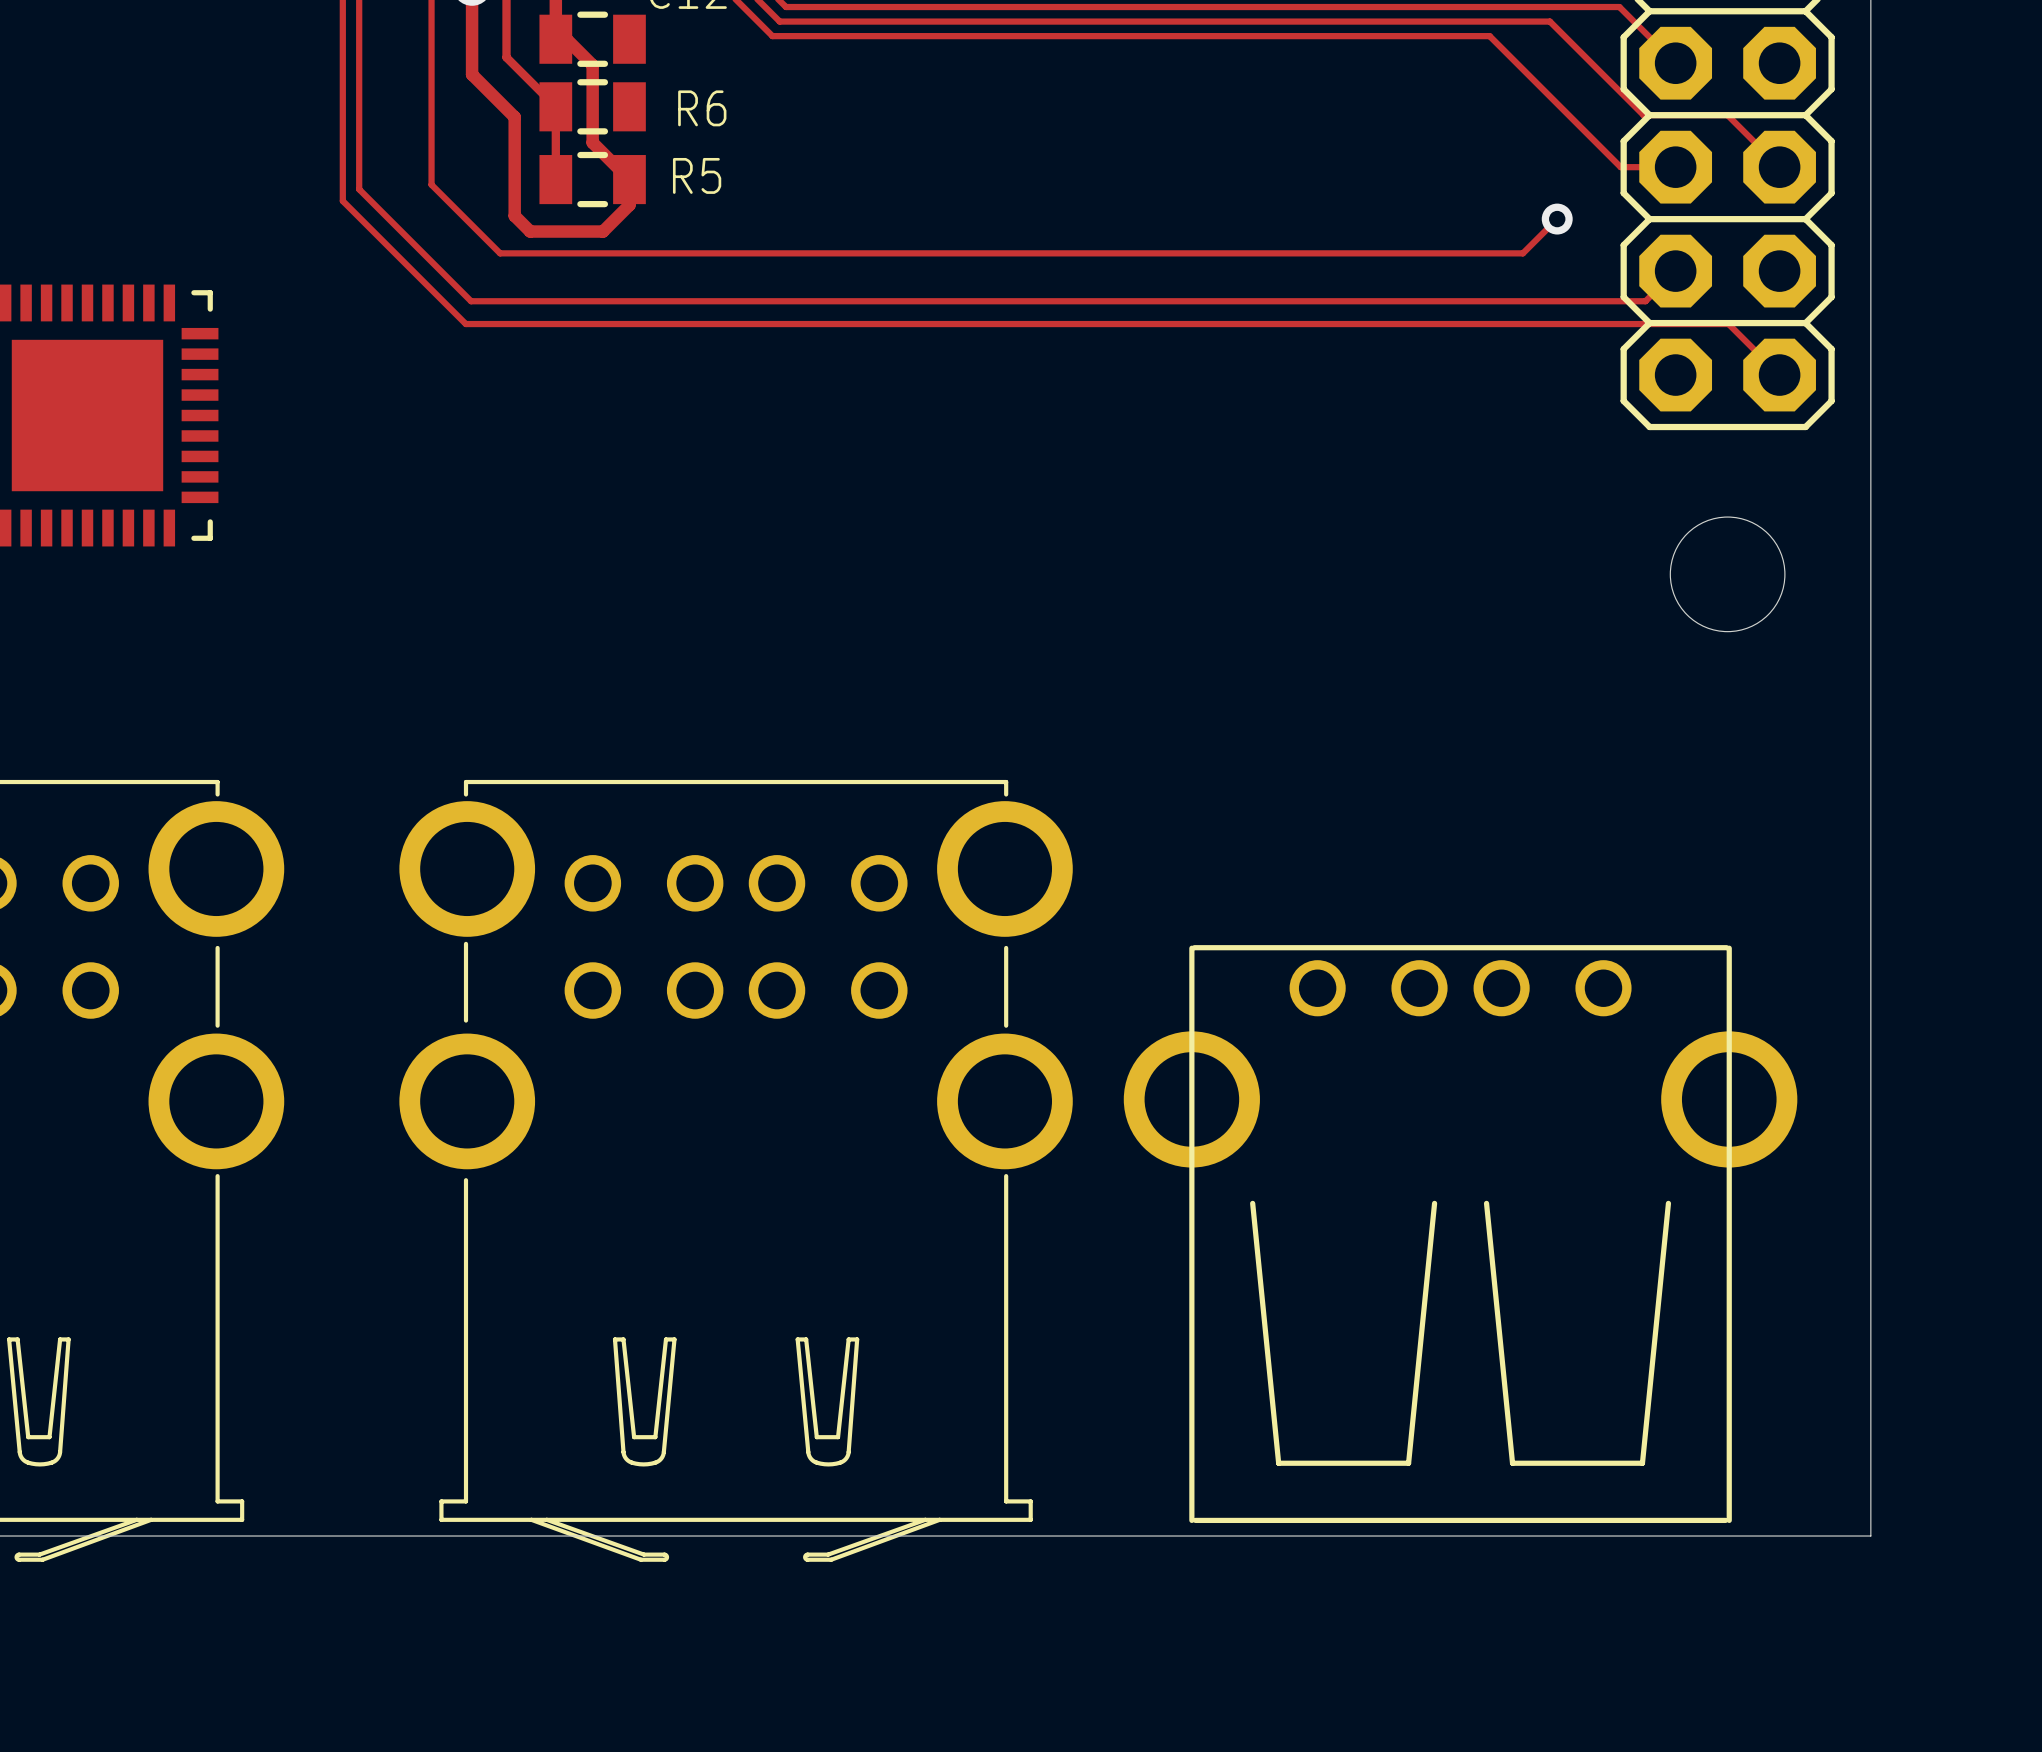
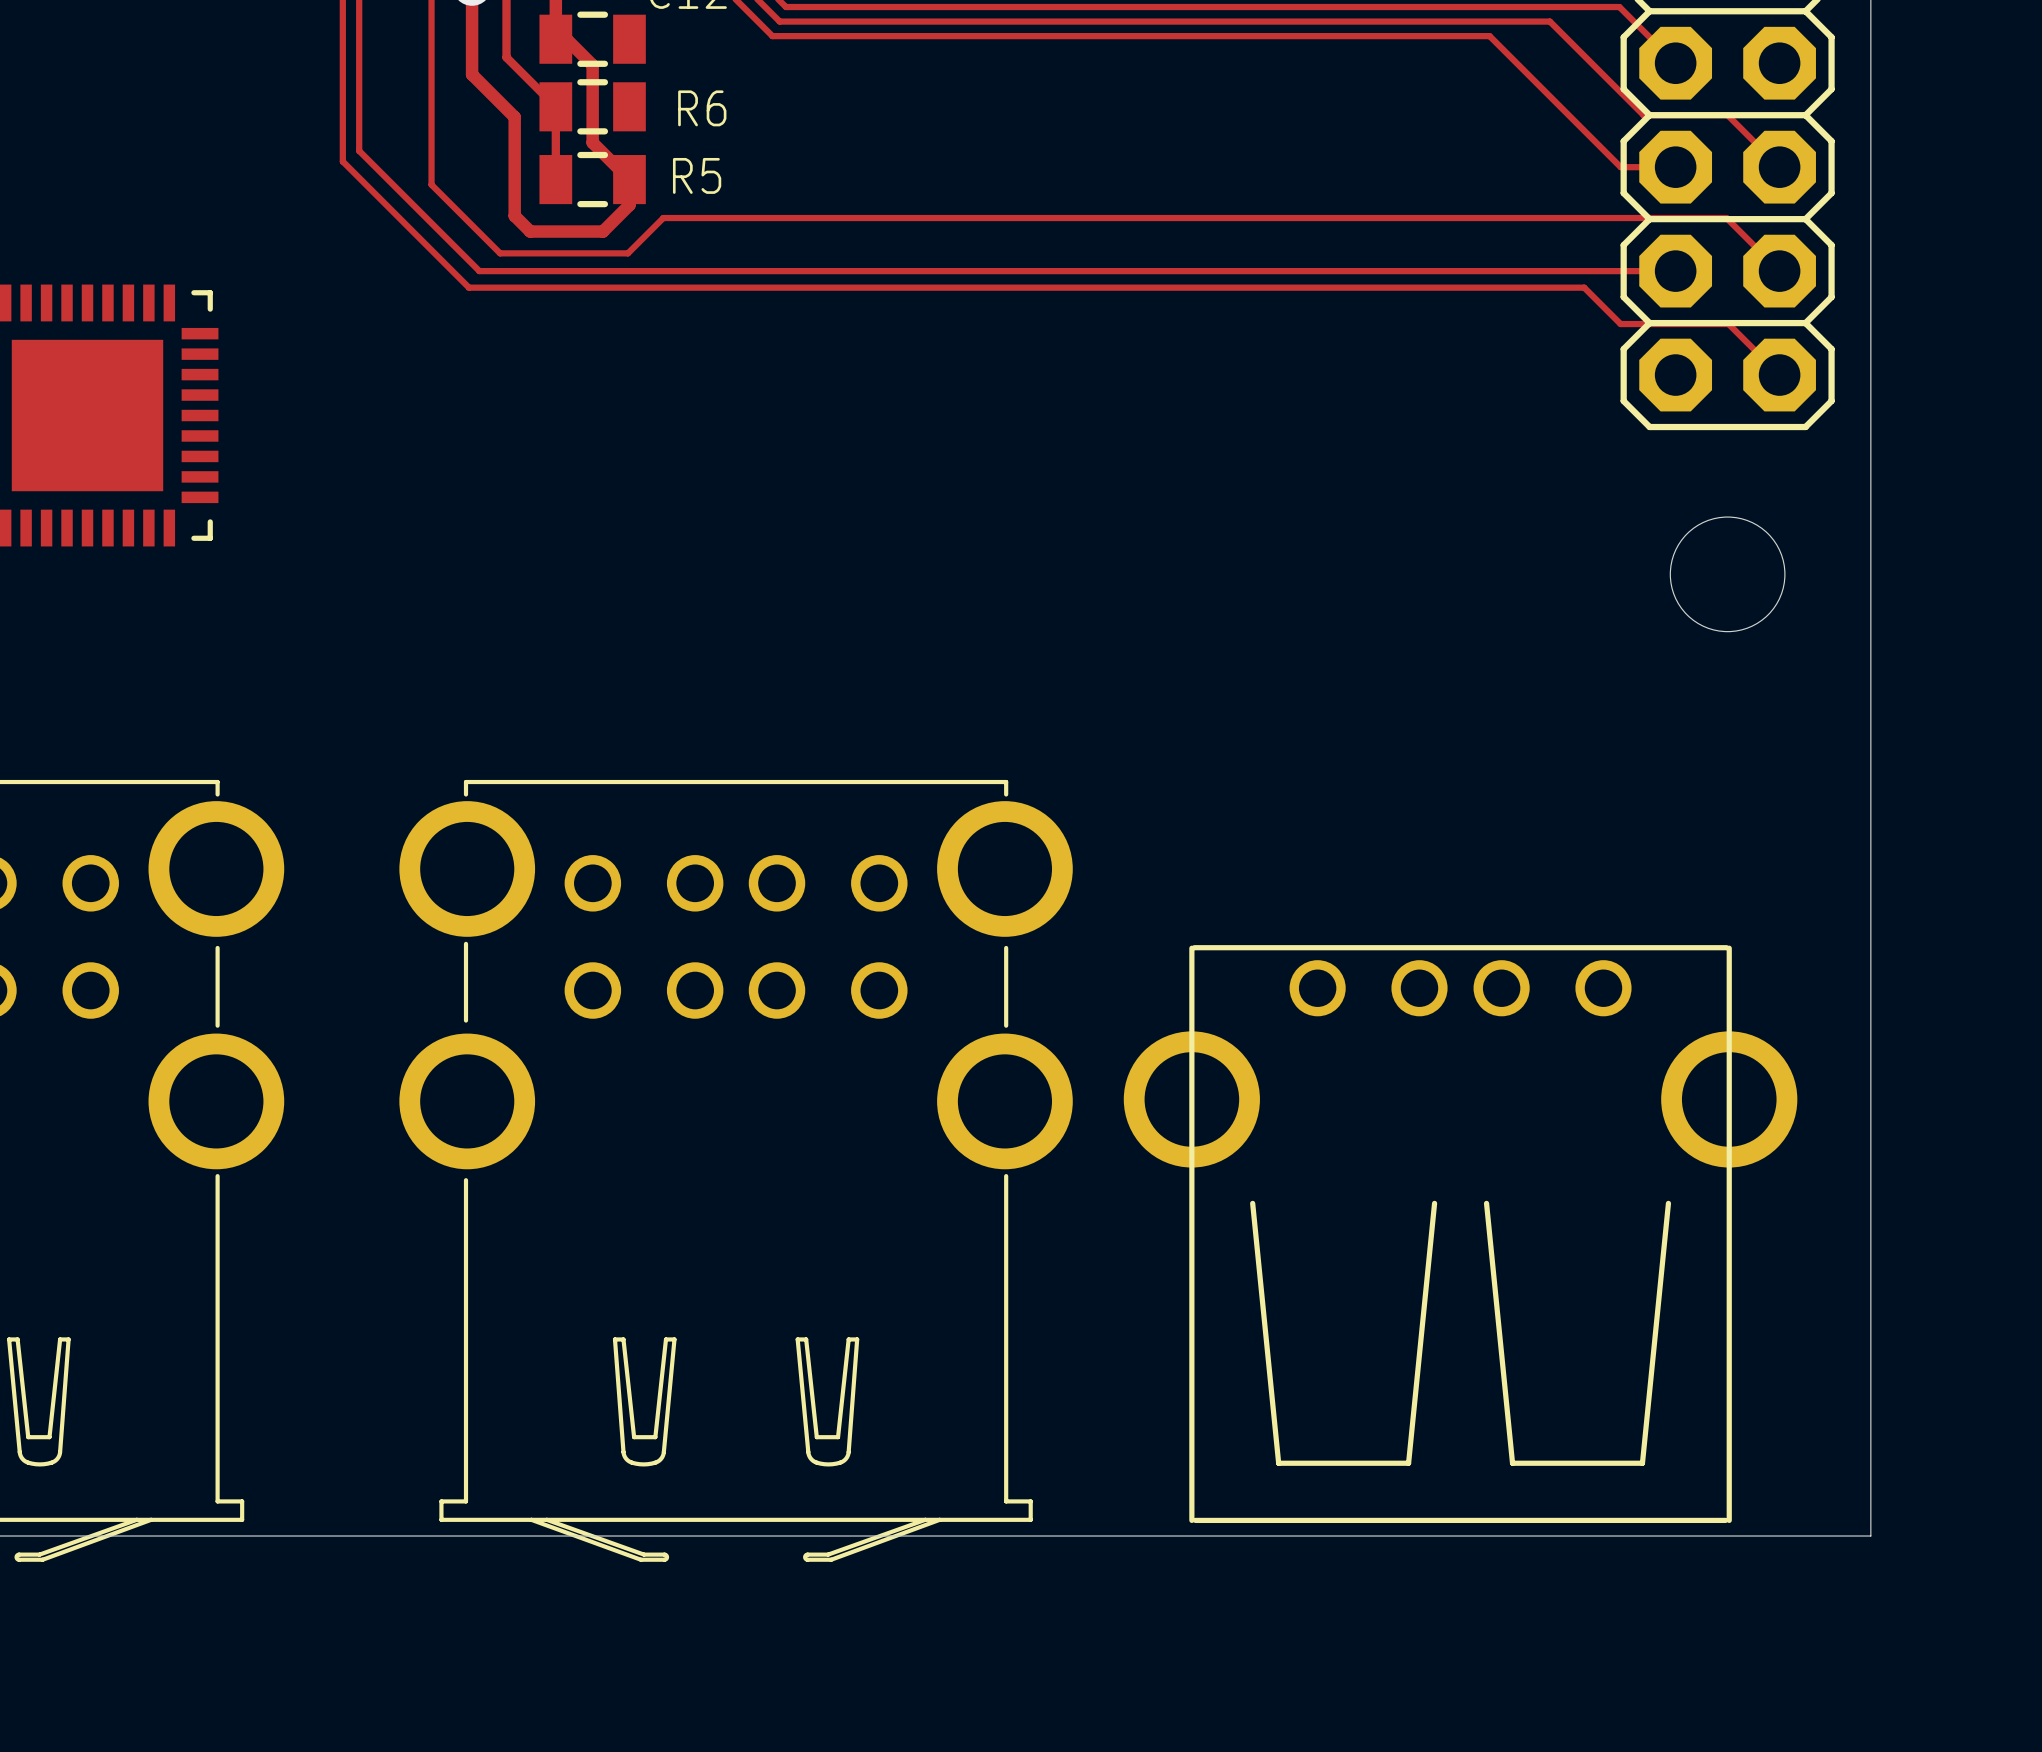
track: (359, 150) (359, 189) (471, 301) (1645, 301) (1675, 271) -> (359, 150) (479, 271) (1675, 271)
track: (342, 161) (342, 201) (465, 324) (1620, 324) -> (342, 161) (468, 287) (1584, 287) (1620, 324)
track: (1557, 219) (1522, 253) (627, 253) -> (1779, 271) (1726, 218) (663, 218) (627, 253)
via: (1557, 219) -> none

